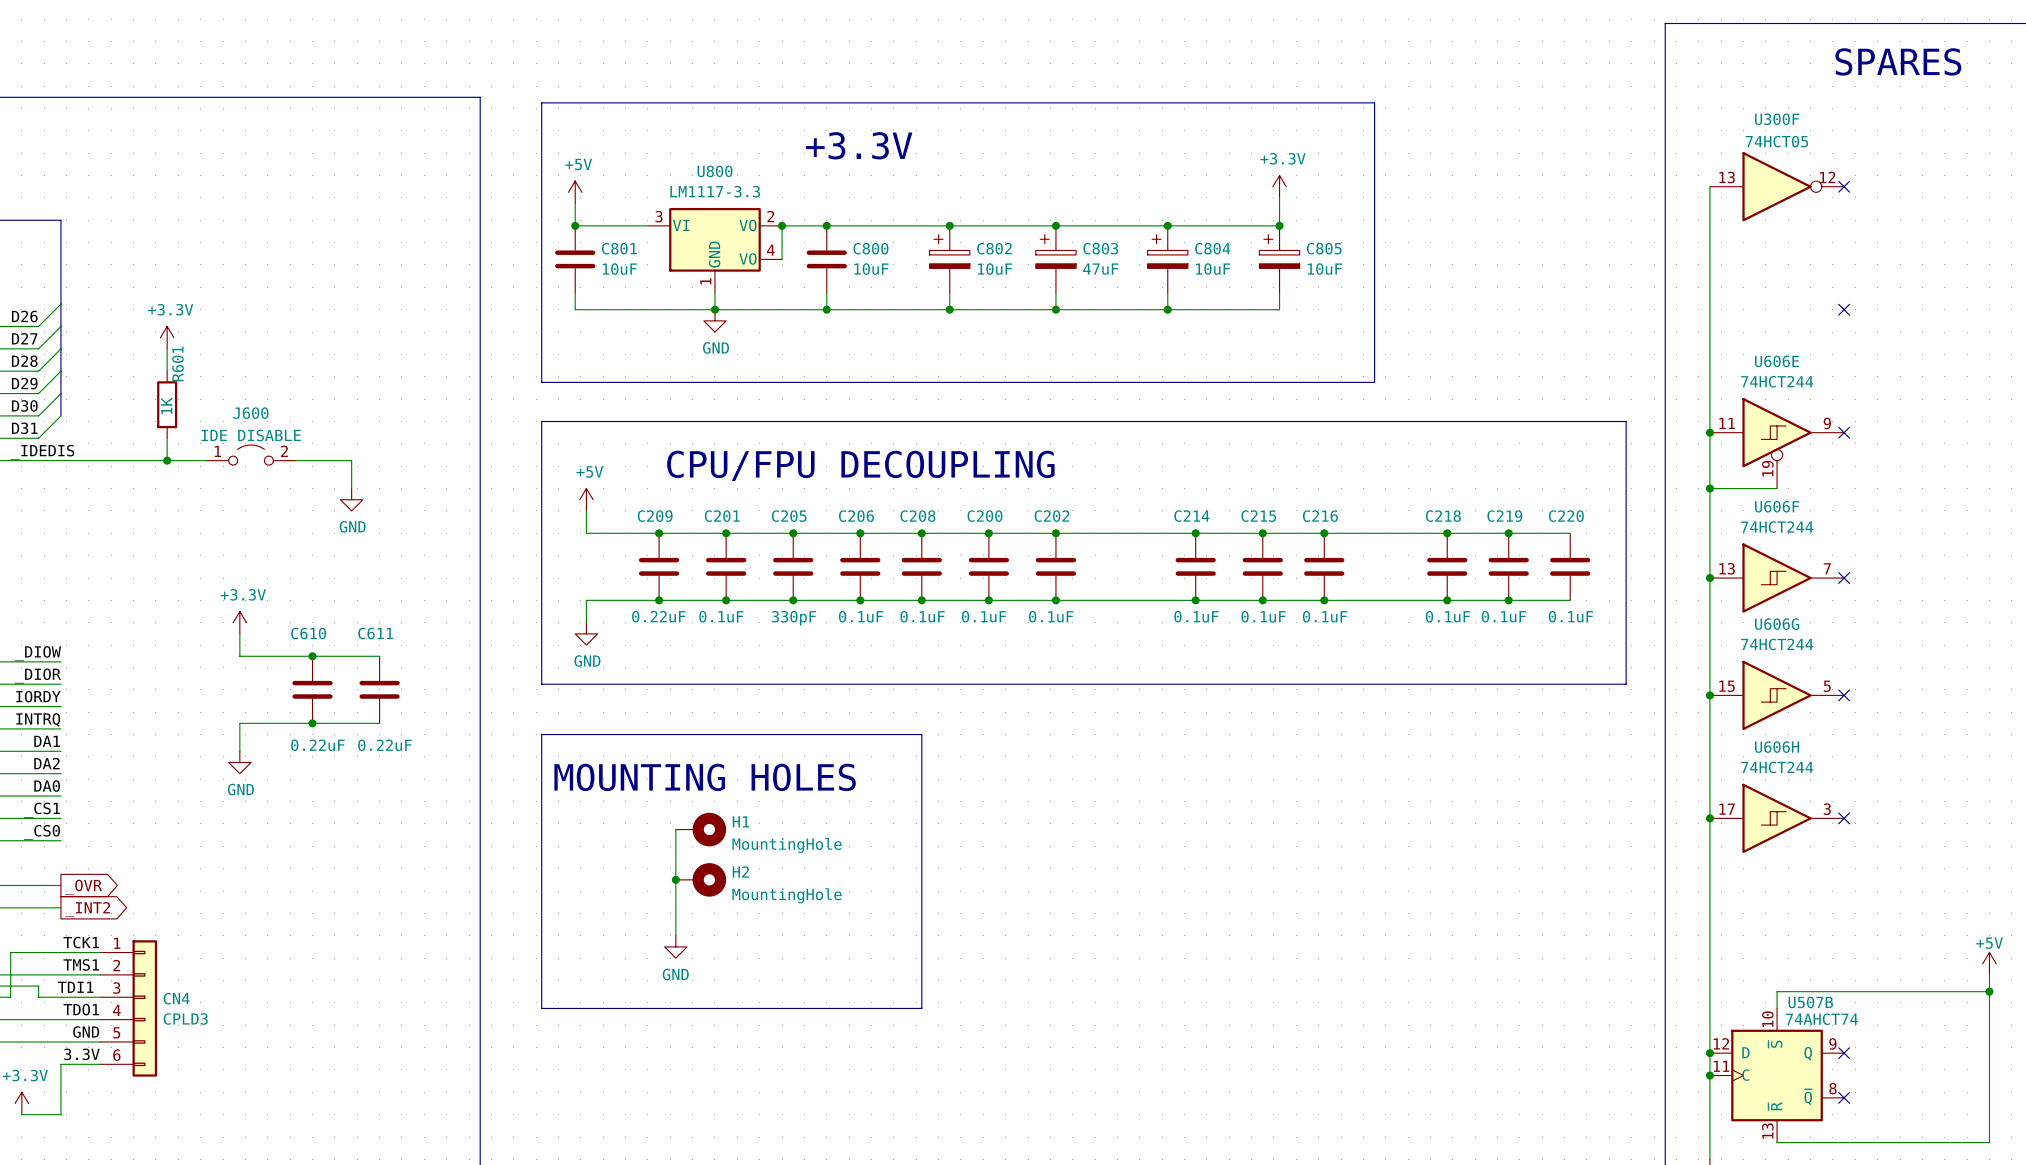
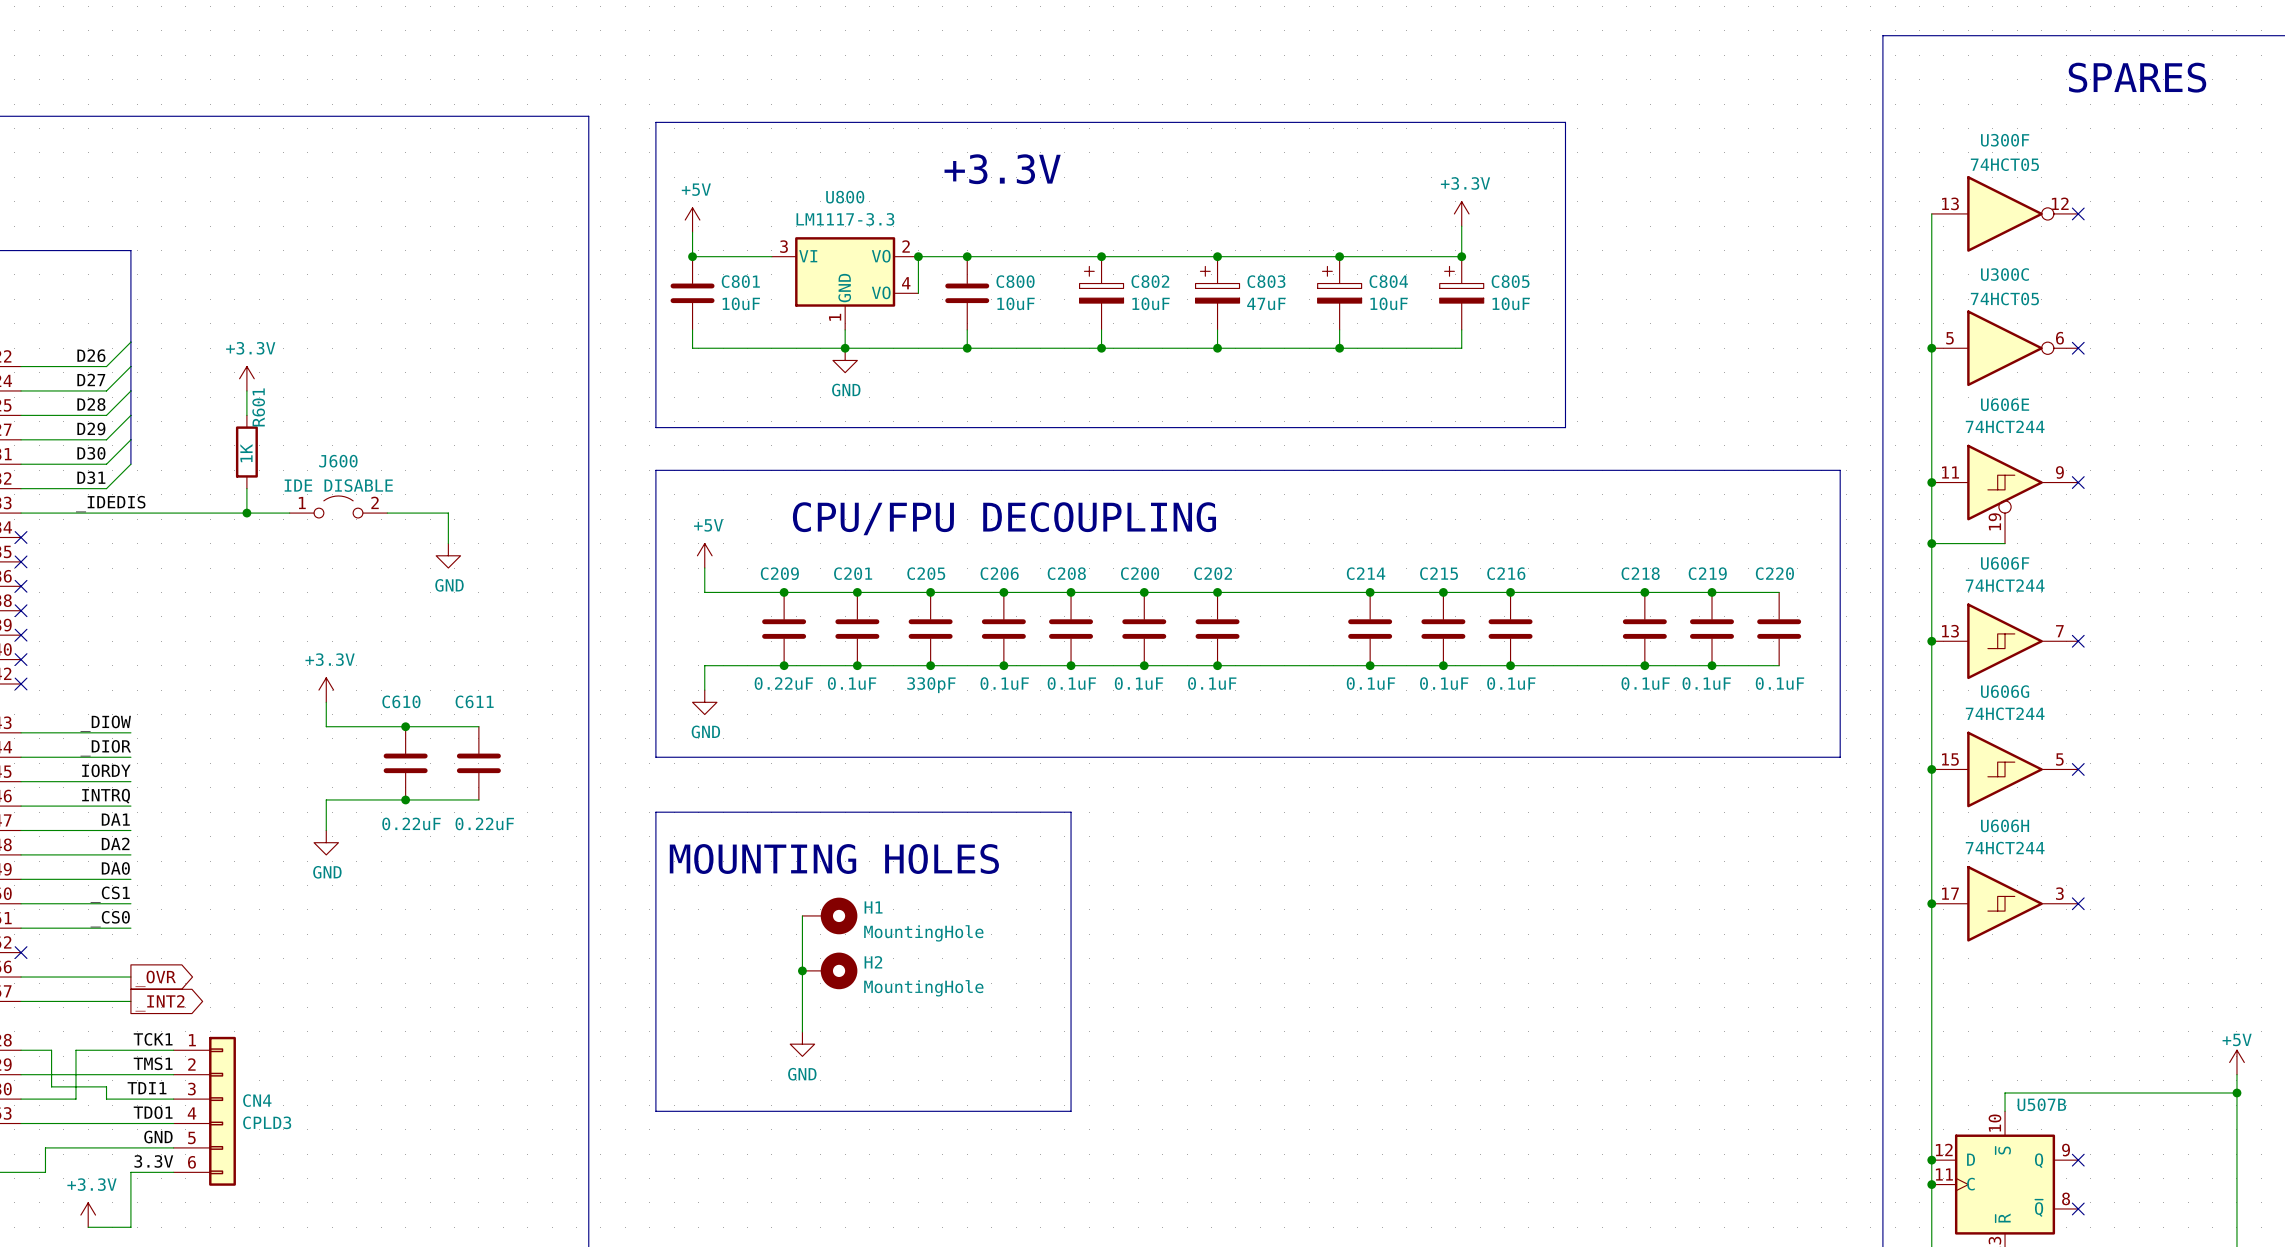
junction: none -> (1931, 348)
U300C: none -> 74HCT05 (2005, 348)
U507B value: 74AHCT74 (1821, 1019) -> none

